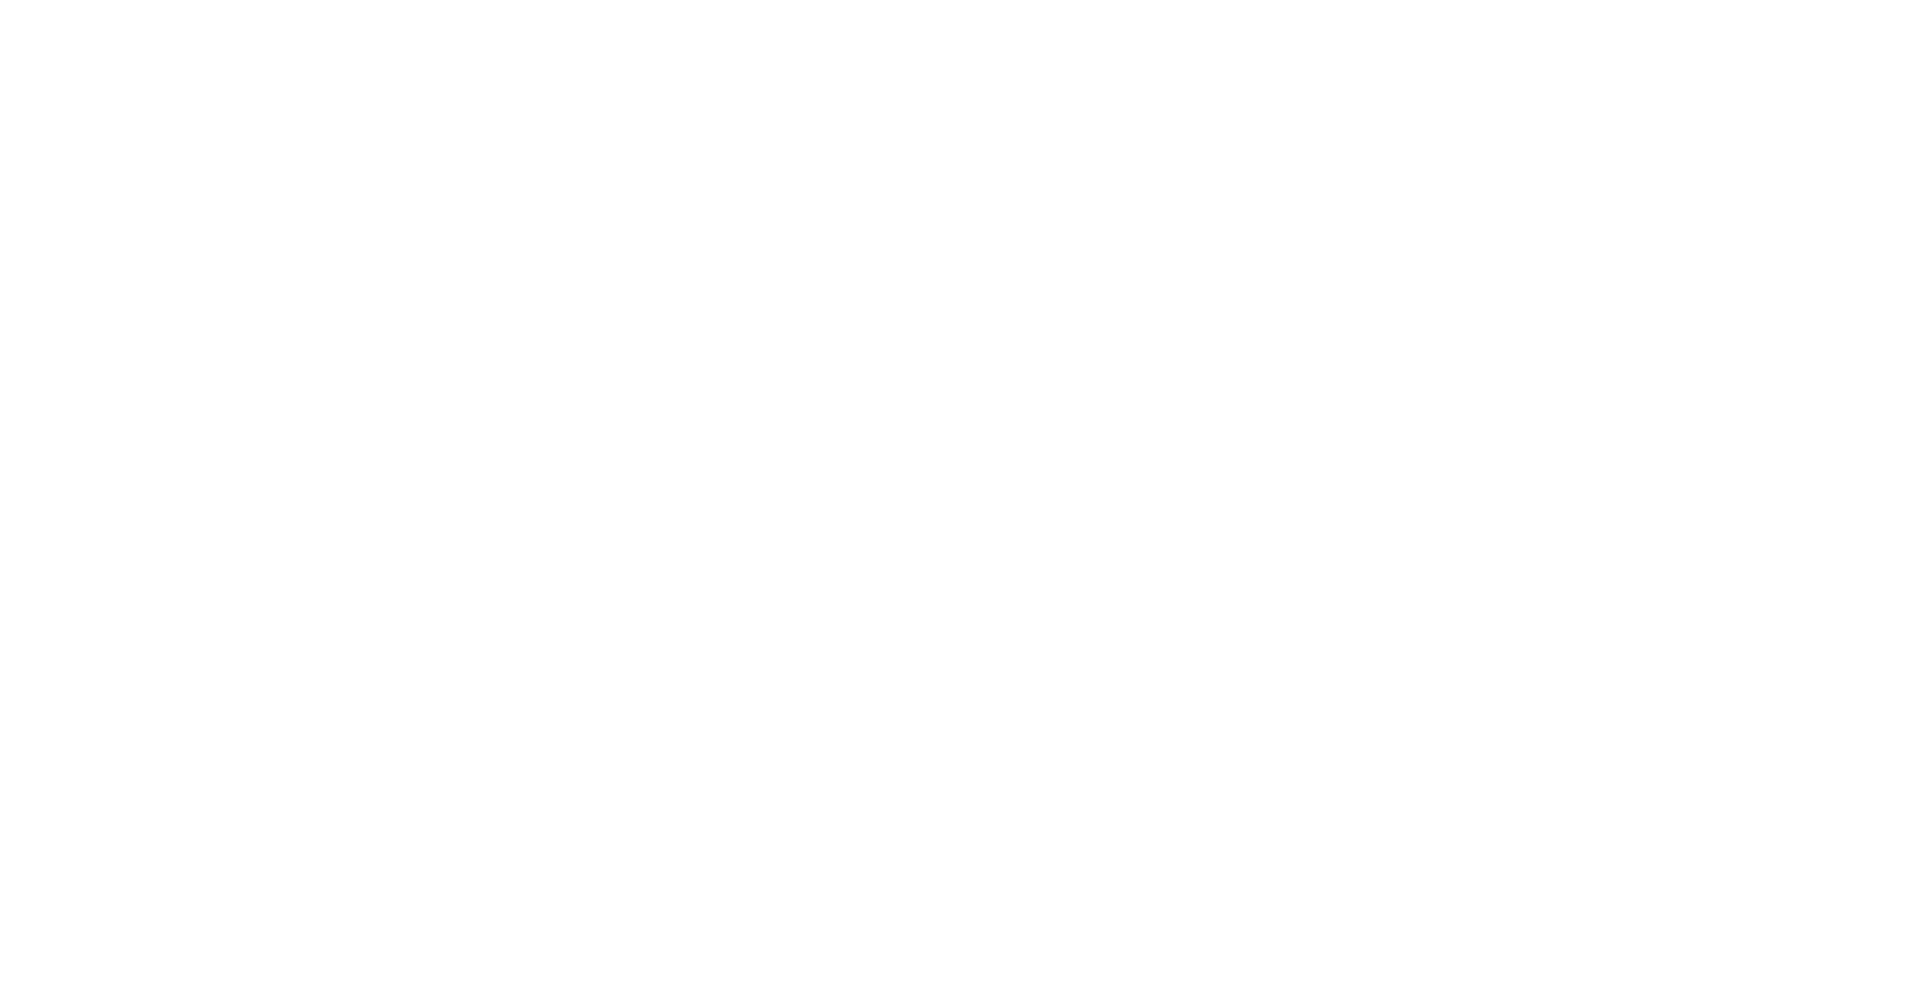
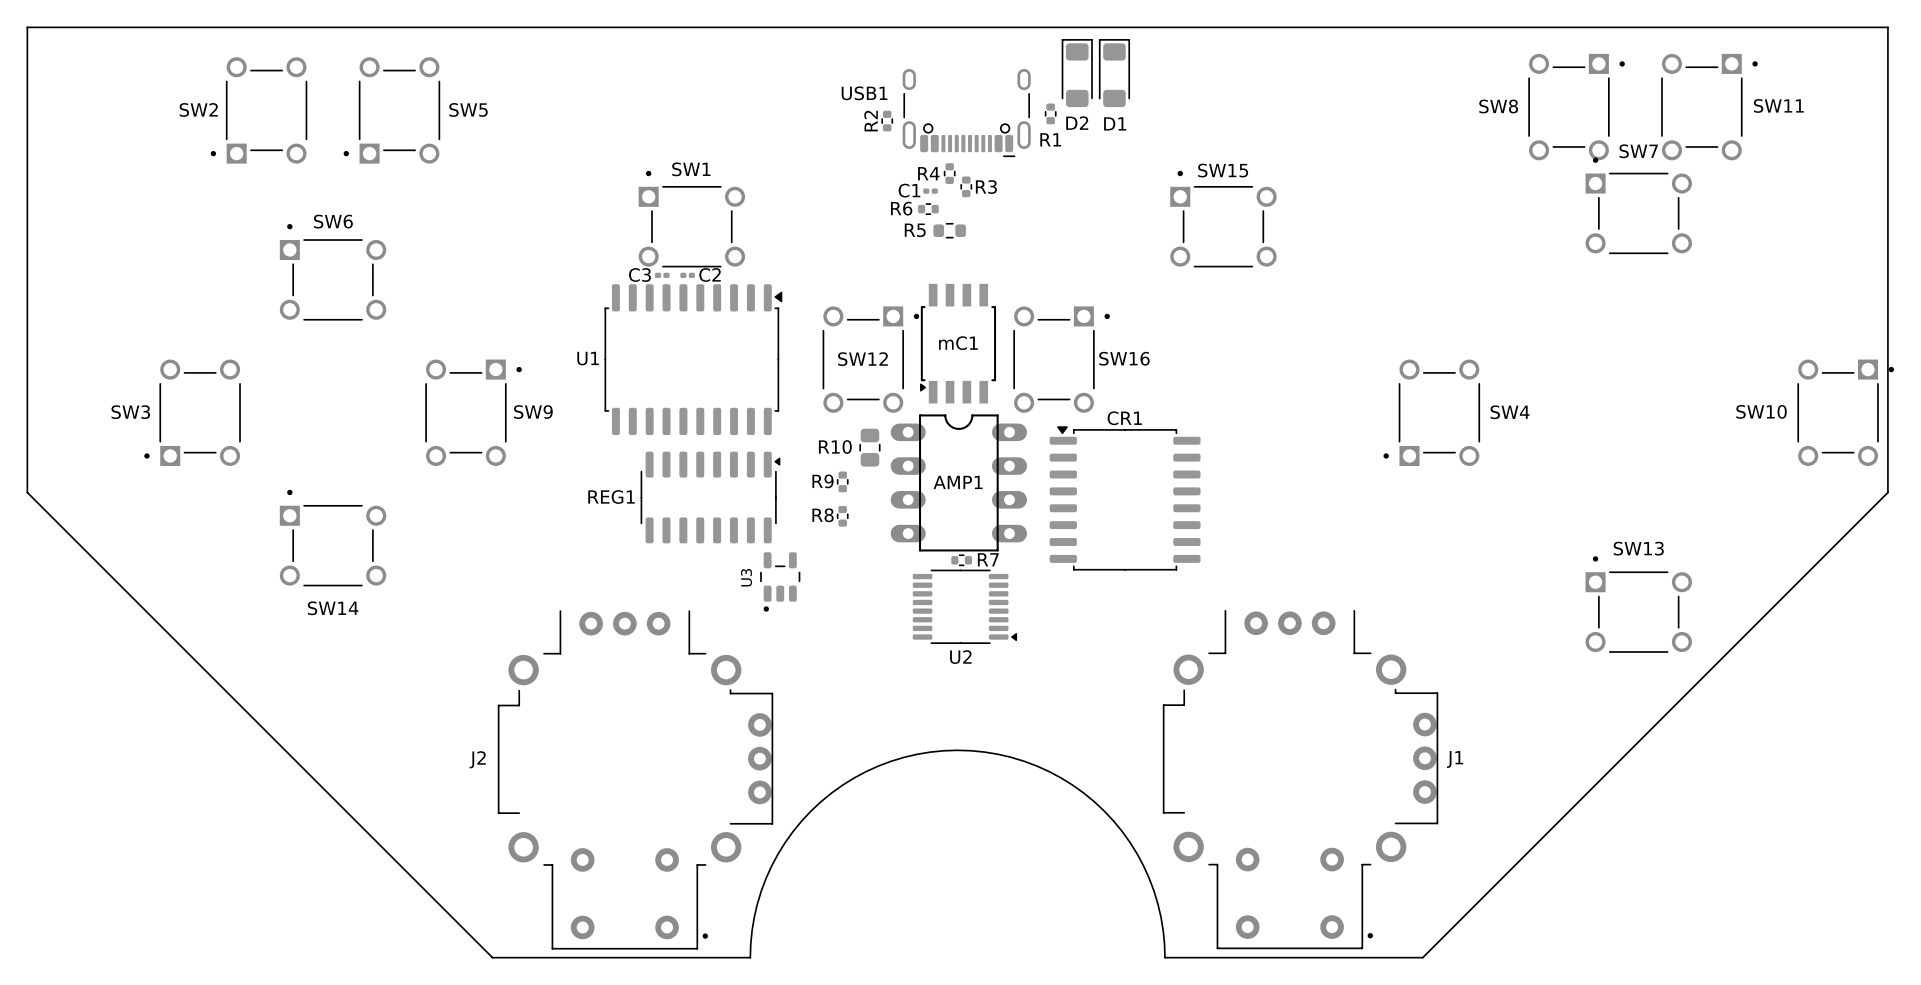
board edge: none -> (27, 27) (27, 492) (492, 957) (750, 957) (754, 917) (766, 878) (785, 842) (811, 811) (842, 785) (878, 766) (917, 754) (957, 750) (998, 754) (1037, 766) (1072, 785) (1104, 811) (1130, 842) (1149, 878) (1161, 917) (1164, 957) (1422, 957) (1887, 492) (1887, 27) (27, 27)
D2: none -> (1077, 73)
D1: none -> (1114, 73)
SW8: none -> (1576, 107)
SW11: none -> (1709, 107)
SW2: none -> (259, 110)
SW5: none -> (391, 110)
USB1: none -> (966, 112)
R1: none -> (1050, 113)
R2: none -> (887, 121)
R4: none -> (949, 173)
R3: none -> (966, 186)
C1: none -> (930, 191)
SW7: none -> (1638, 205)
R6: none -> (928, 209)
SW1: none -> (691, 219)
SW15: none -> (1223, 219)
R5: none -> (949, 230)
SW6: none -> (333, 272)
C3: none -> (662, 275)
C2: none -> (687, 275)
mC1: none -> (958, 343)
U1: none -> (693, 359)
SW12: none -> (870, 359)
SW16: none -> (1061, 359)
SW3: none -> (192, 412)
SW9: none -> (473, 412)
SW4: none -> (1431, 412)
SW10: none -> (1845, 412)
R10: none -> (869, 447)
R9: none -> (842, 481)
AMP1: none -> (958, 482)
REG1: none -> (710, 497)
CR1: none -> (1125, 498)
R8: none -> (842, 516)
SW14: none -> (333, 538)
R7: none -> (961, 560)
U3: none -> (780, 581)
SW13: none -> (1638, 604)
U2: none -> (964, 606)
J2: none -> (635, 779)
J1: none -> (1300, 779)

